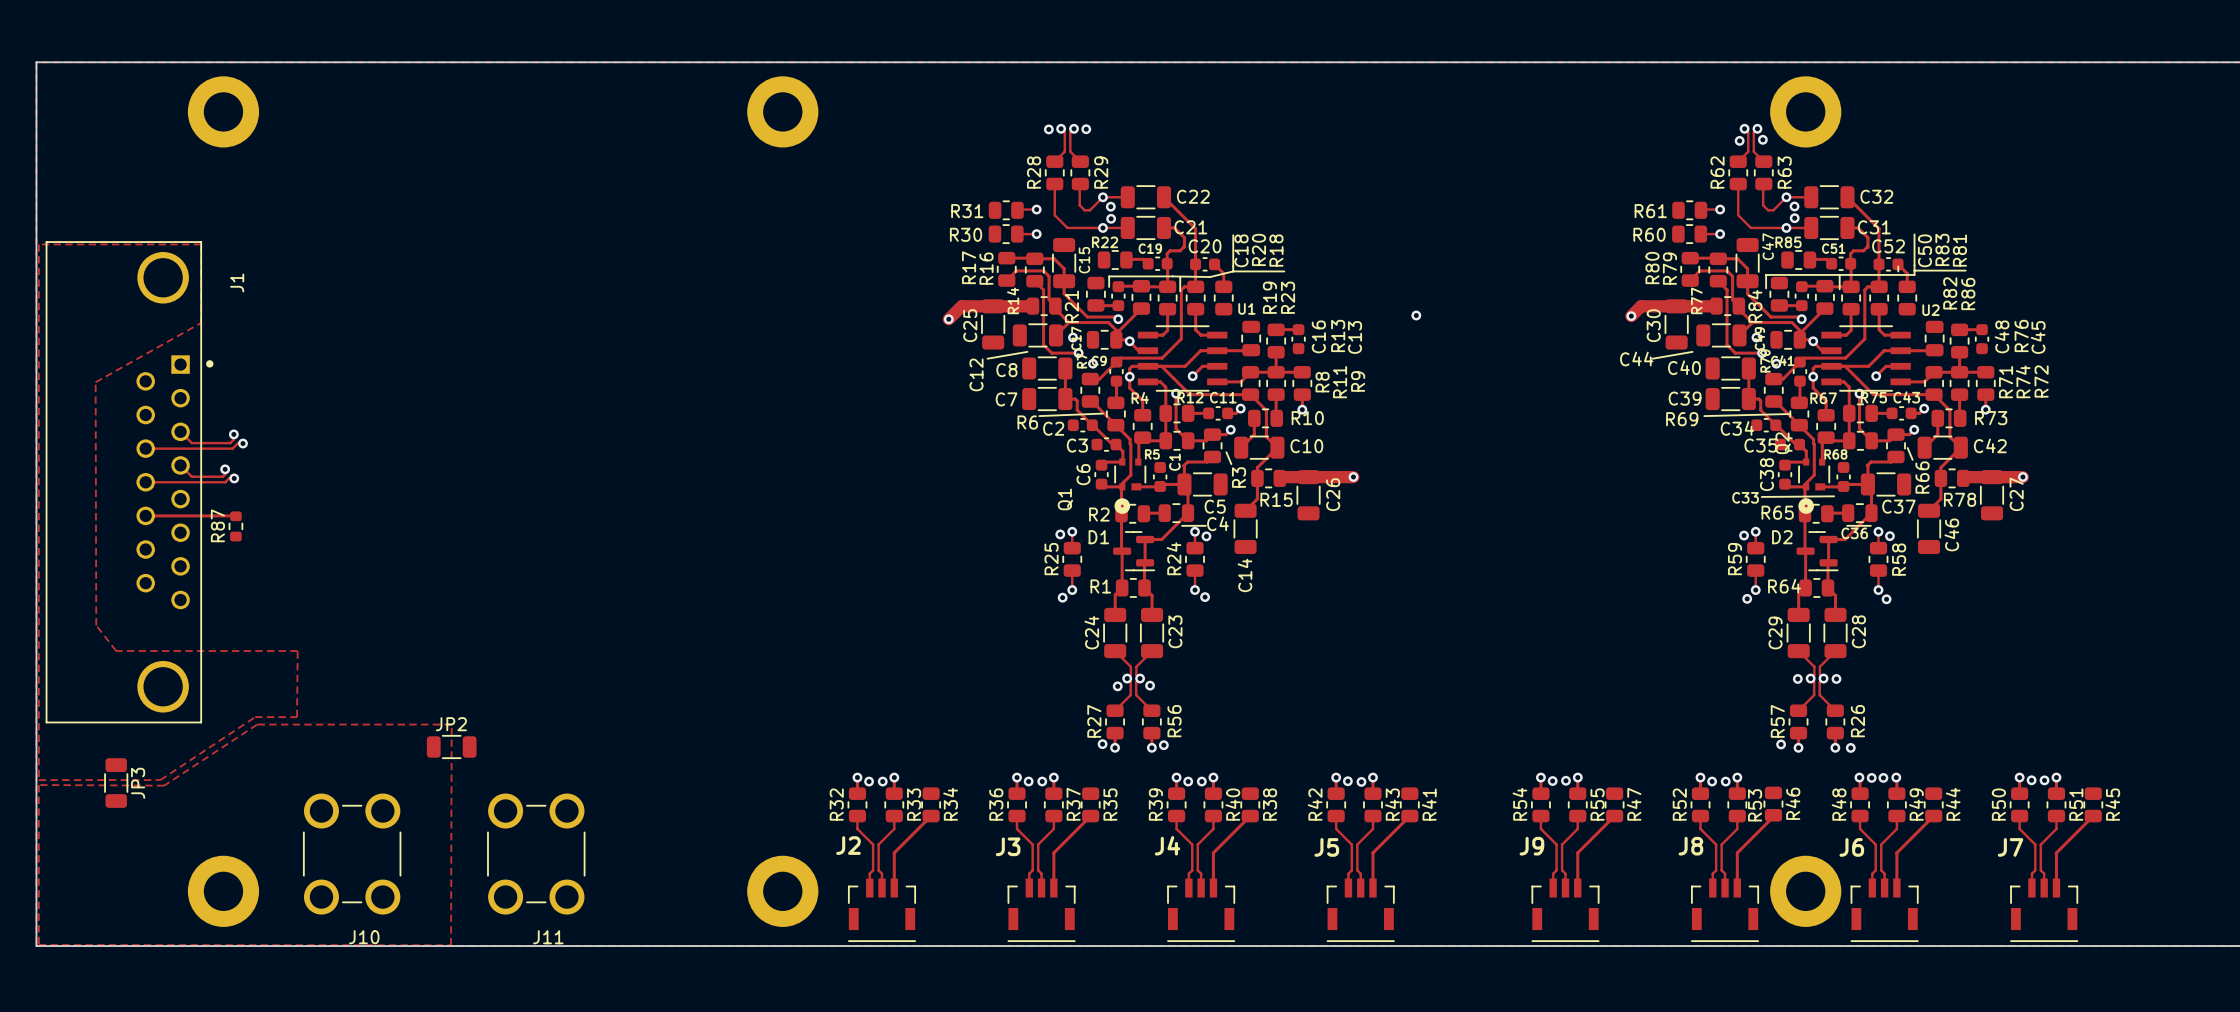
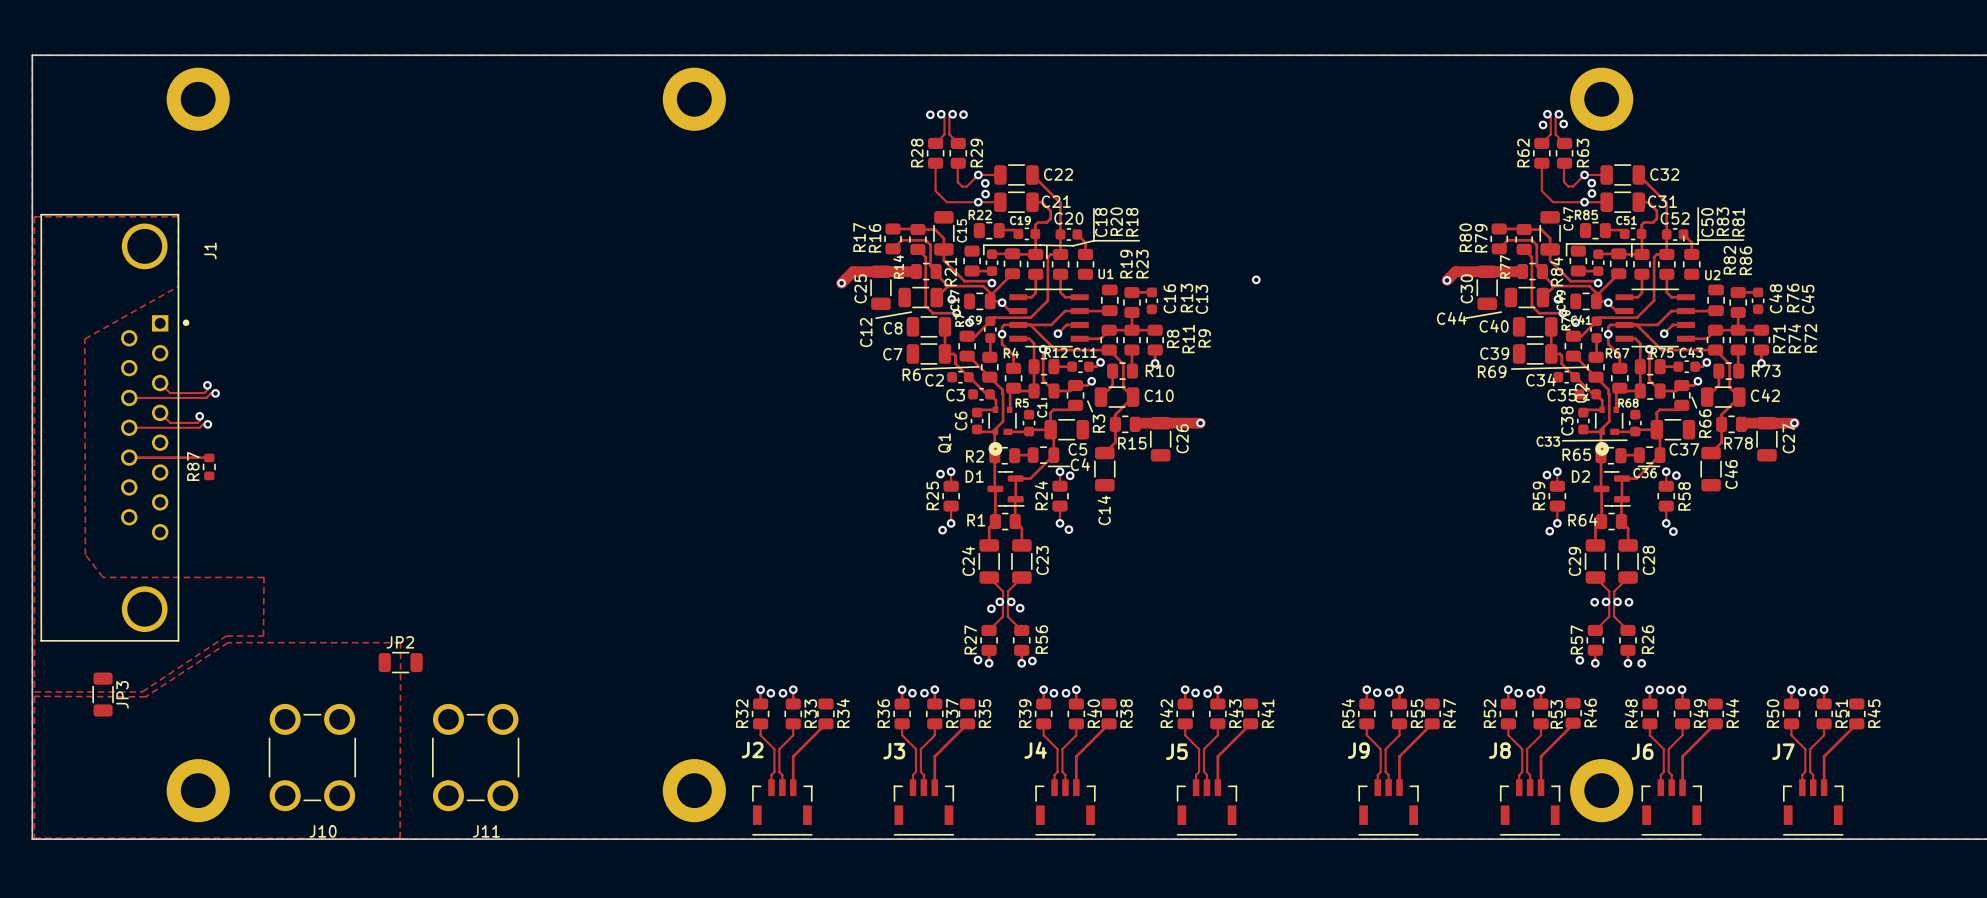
track: (1017, 209) (1036, 209) -> none
via: (1036, 209) -> none
track: (1700, 209) (1720, 209) -> none
via: (1720, 209) -> none
R31: (1006, 210) -> none
R61: (1689, 210) -> none
R30: (1006, 234) -> none
track: (1017, 234) (1036, 234) -> none
via: (1036, 234) -> none
R60: (1689, 234) -> none
track: (1700, 234) (1720, 234) -> none
via: (1720, 234) -> none

